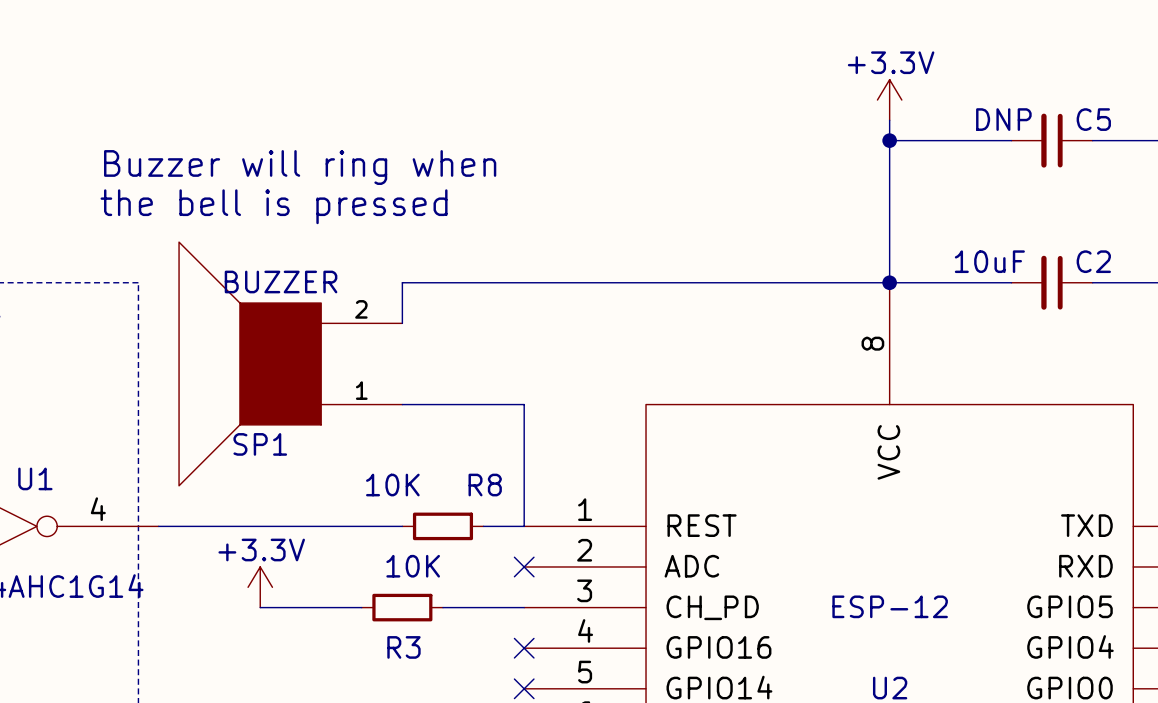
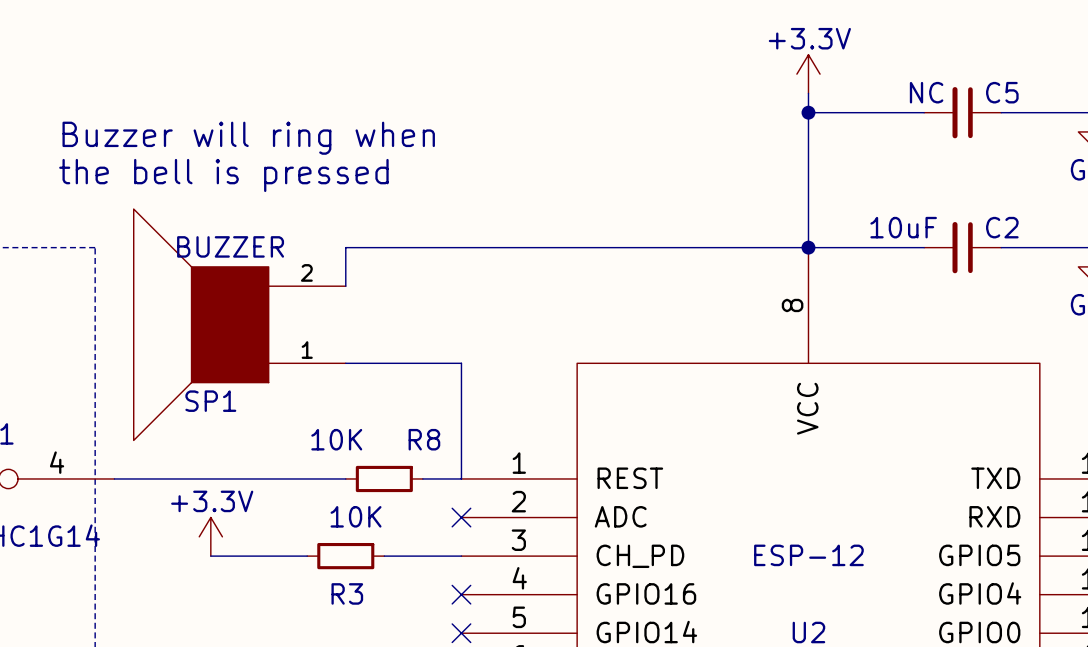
C5 value: DNP (1003, 119) -> NC (926, 92)

